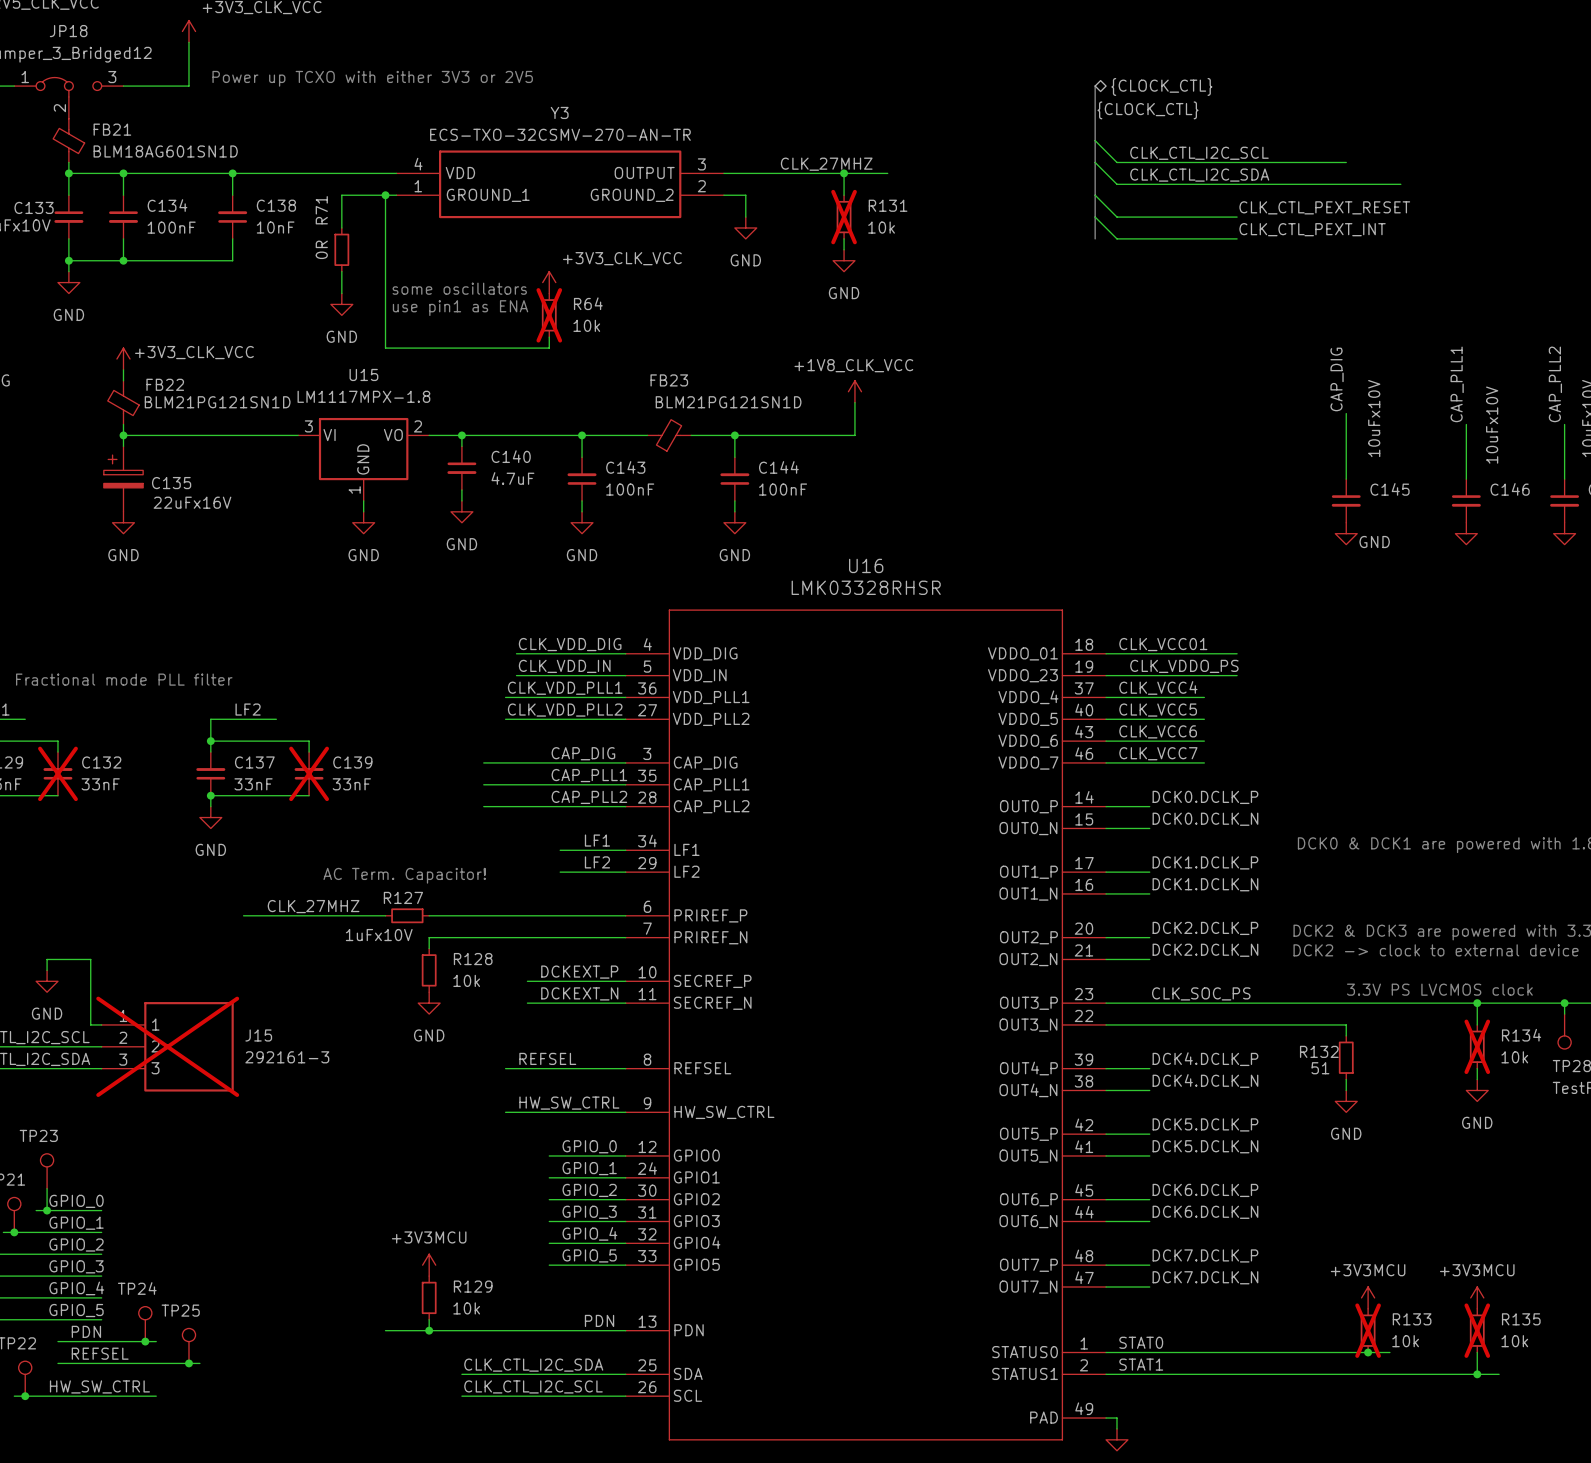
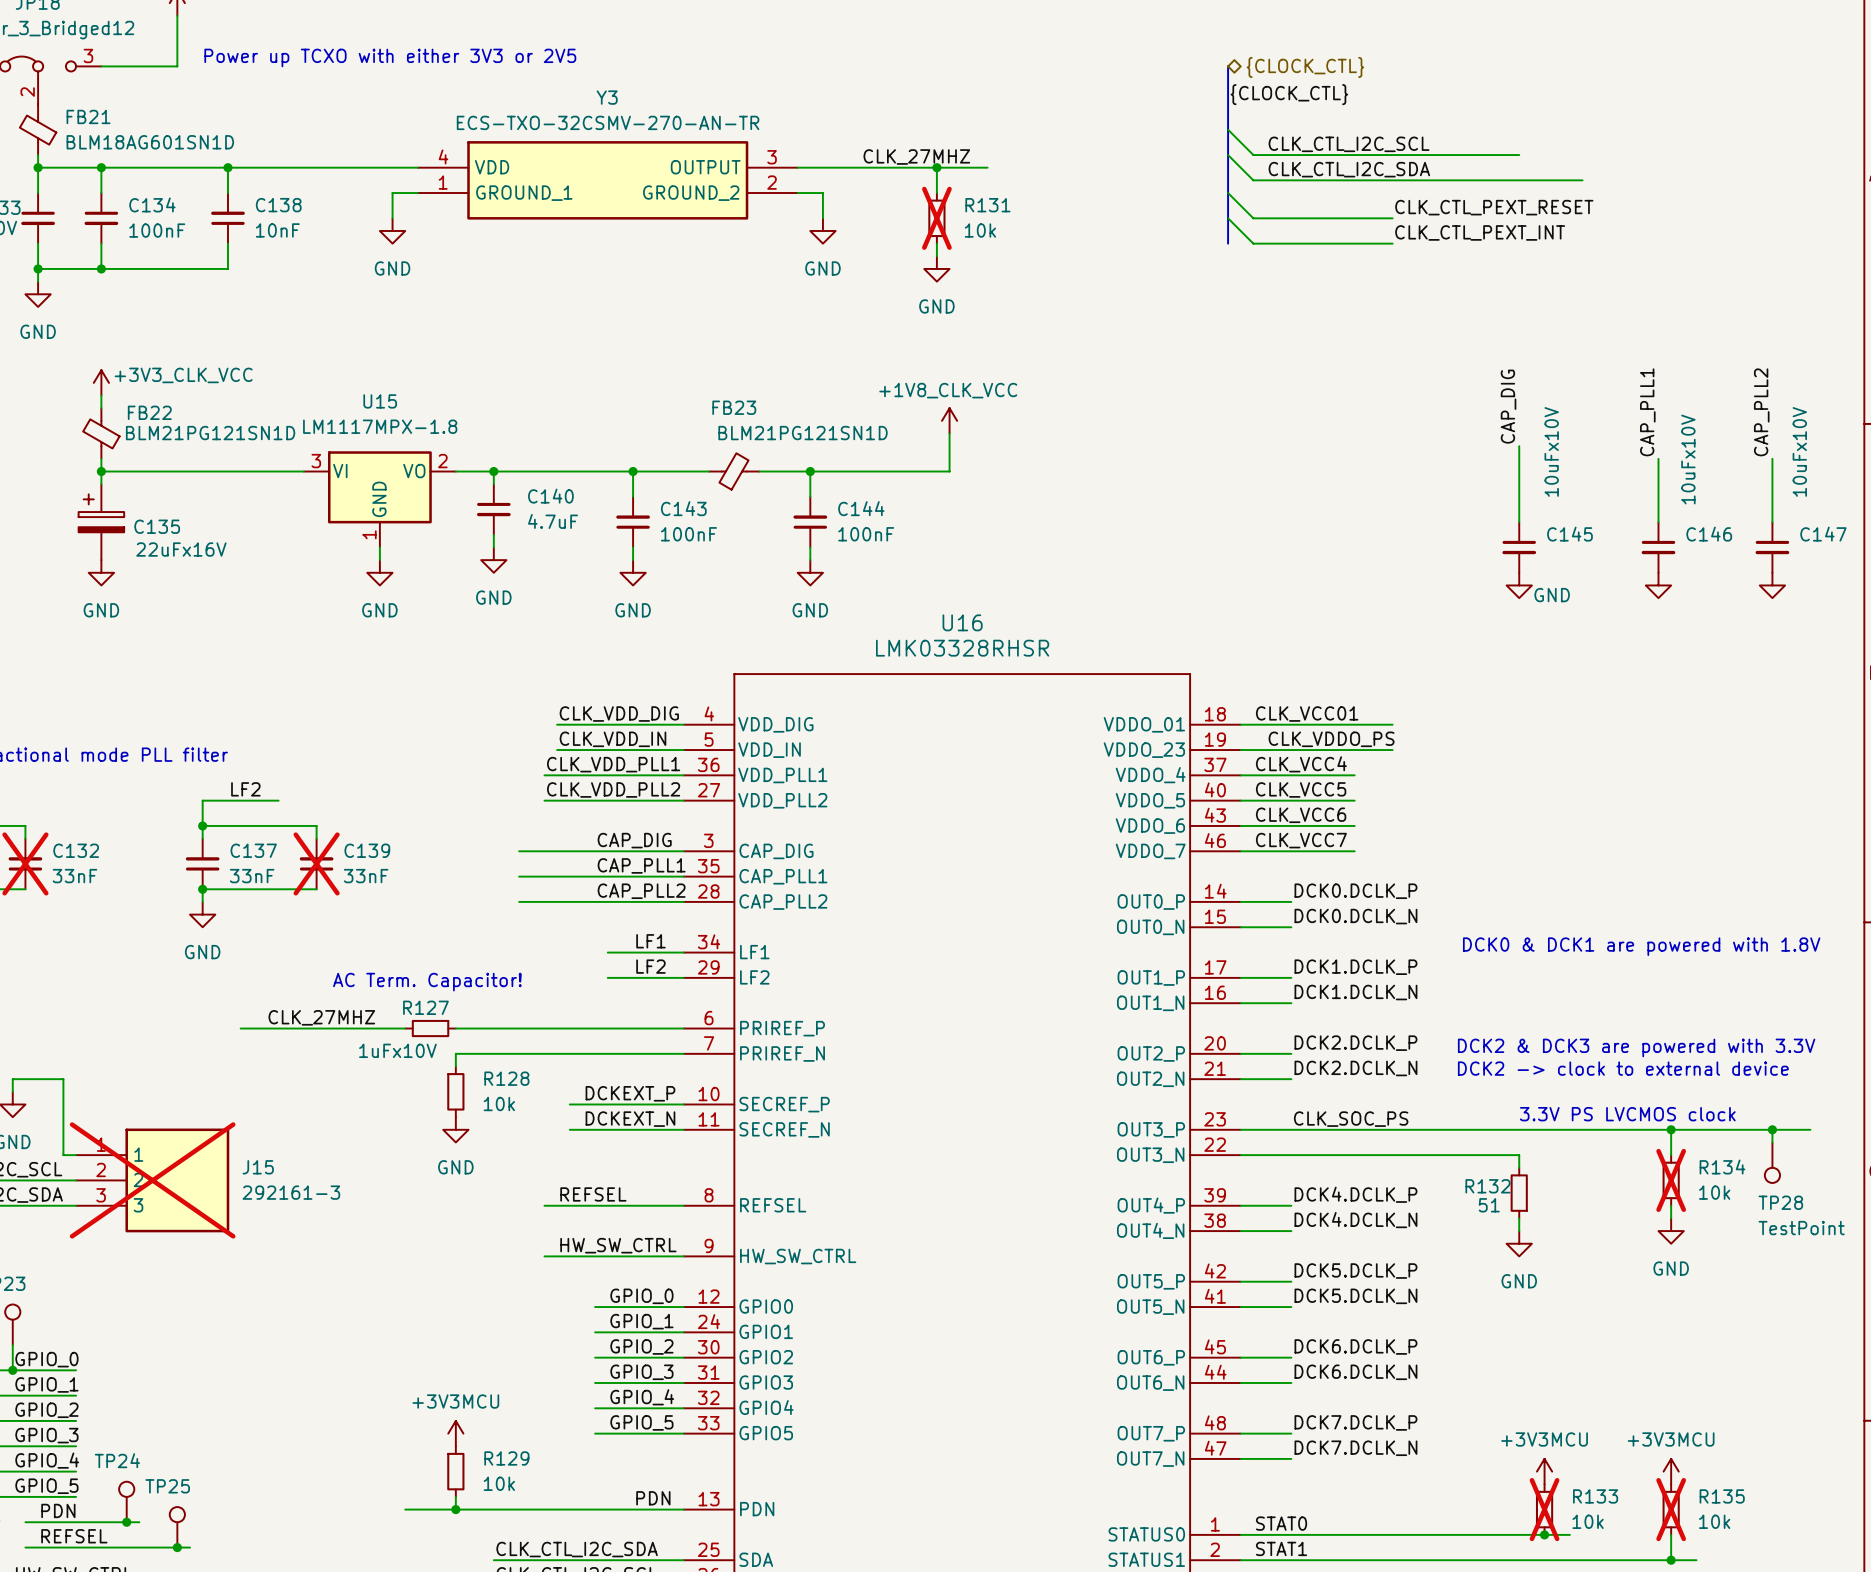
wire: (374, 195) (341, 195) (341, 227) -> (392, 193) (392, 218)
wire: (385, 195) (385, 348) (549, 348) (549, 337) -> none
junction: (385, 195) -> none
R71: 0R (341, 249) -> none
wire: (341, 271) (341, 293) -> none
power symbol: +3V3_CLK_VCC (549, 282) -> none
text: some oscillators (459, 288) -> none
power symbol position: GND (341, 304) -> GND (392, 230)
text: use pin1 as ENA (460, 308) -> none
R64: 10k (549, 315) -> none

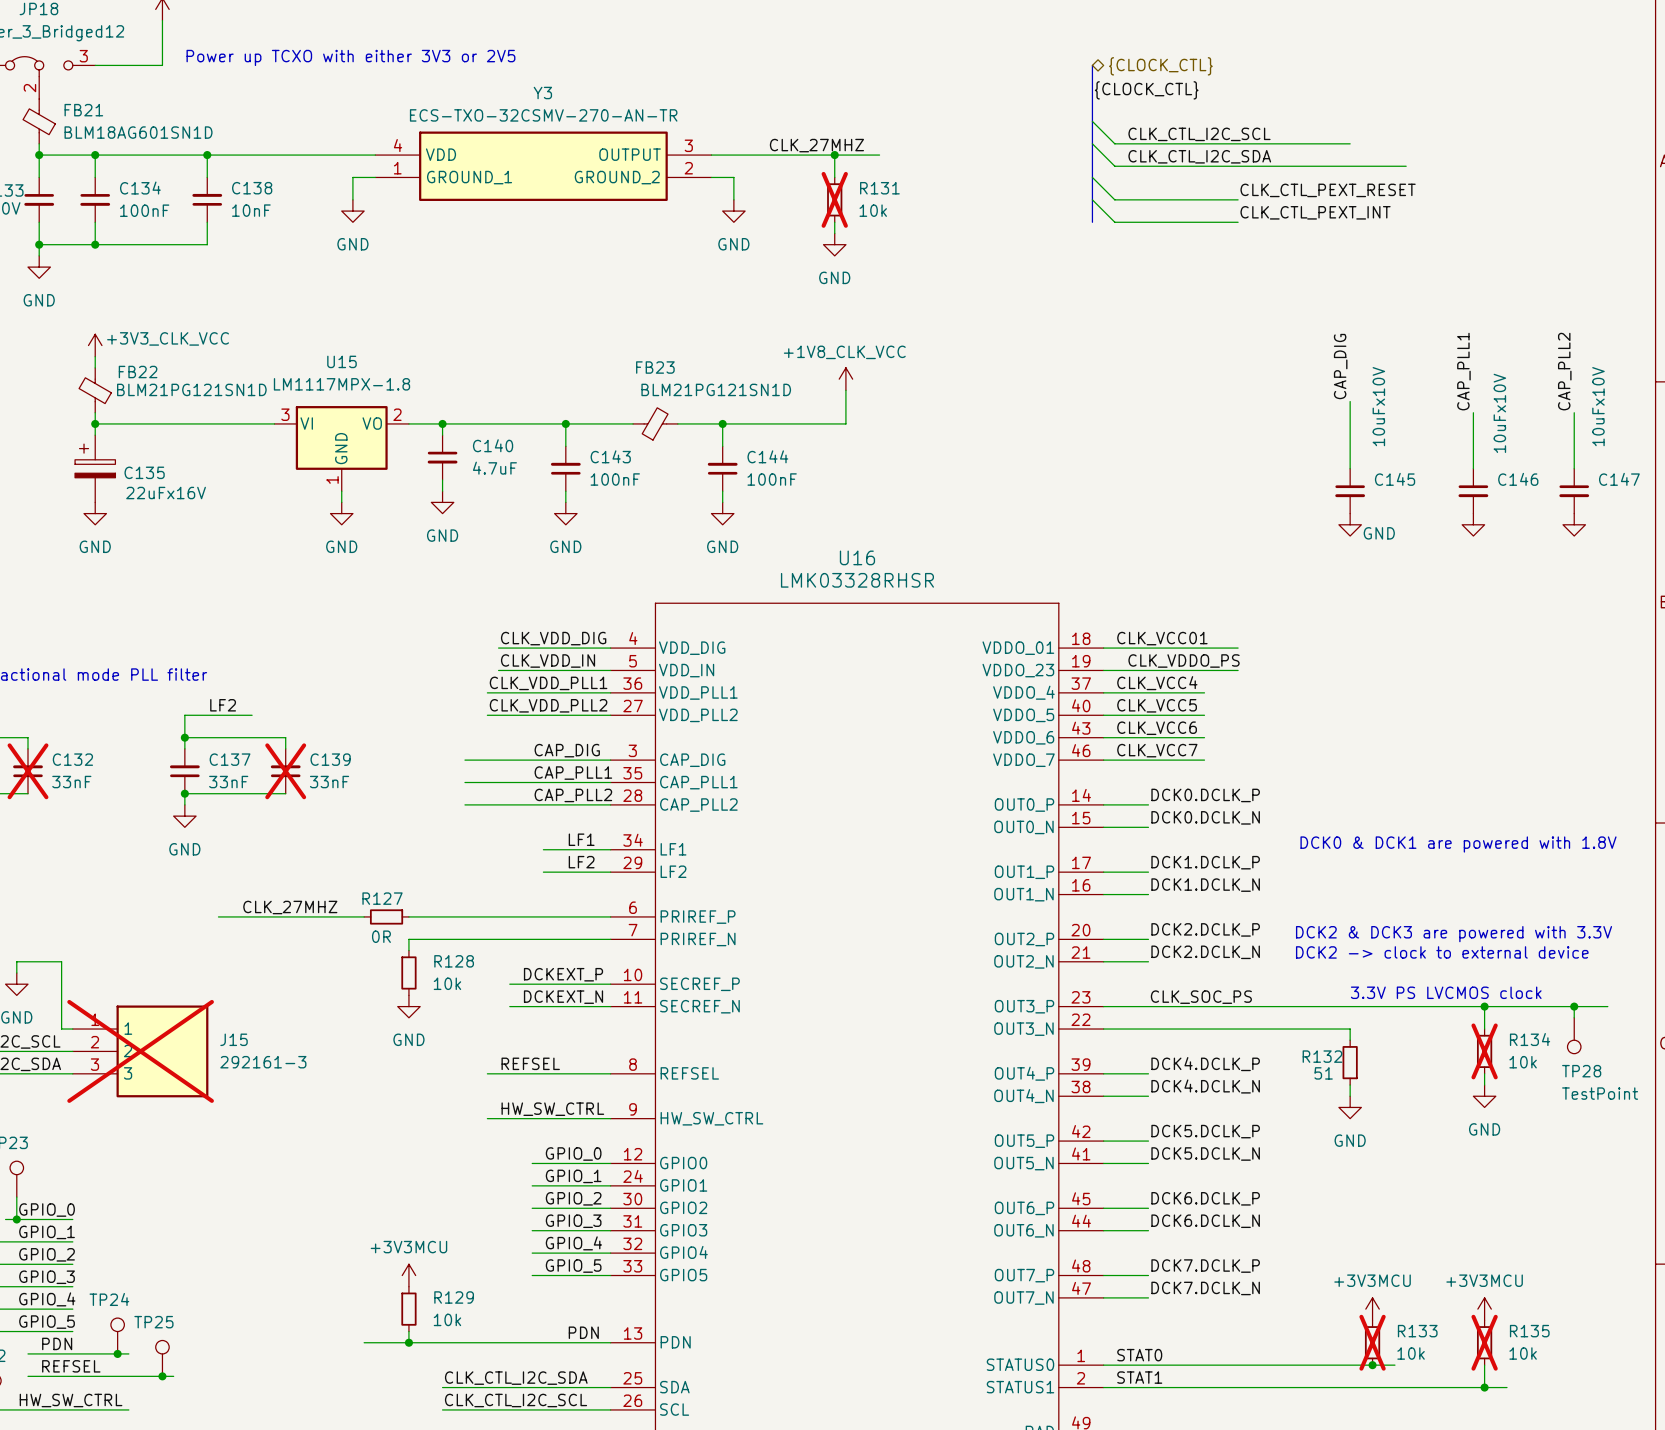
text: AC Term. Capacitor! (427, 982) -> none
R127 value: 1uFx10V (397, 1050) -> 0R (381, 936)

